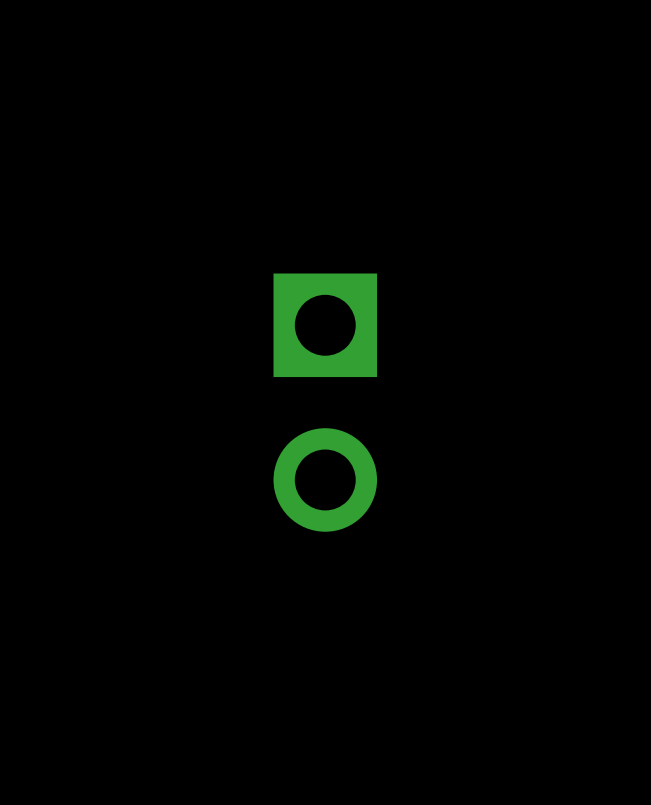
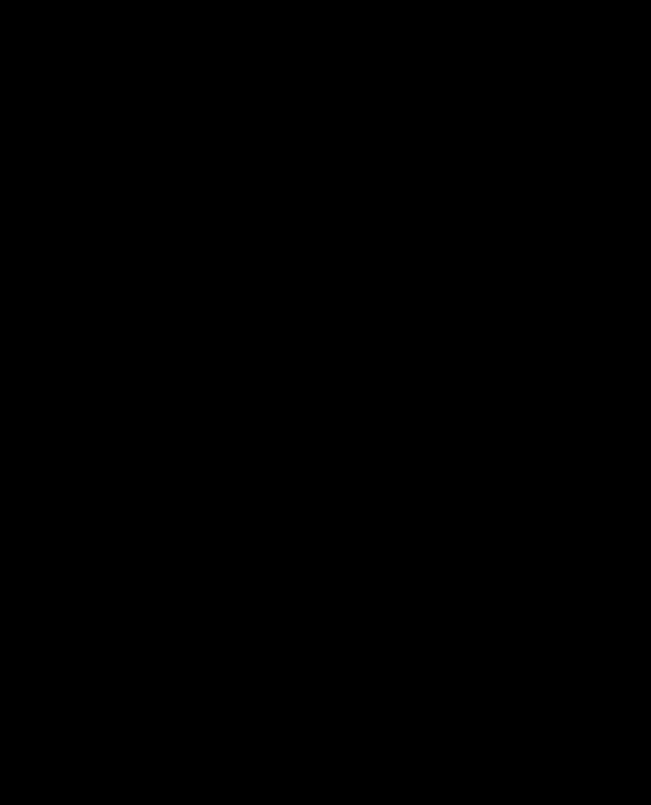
part: (325, 402) -> none

